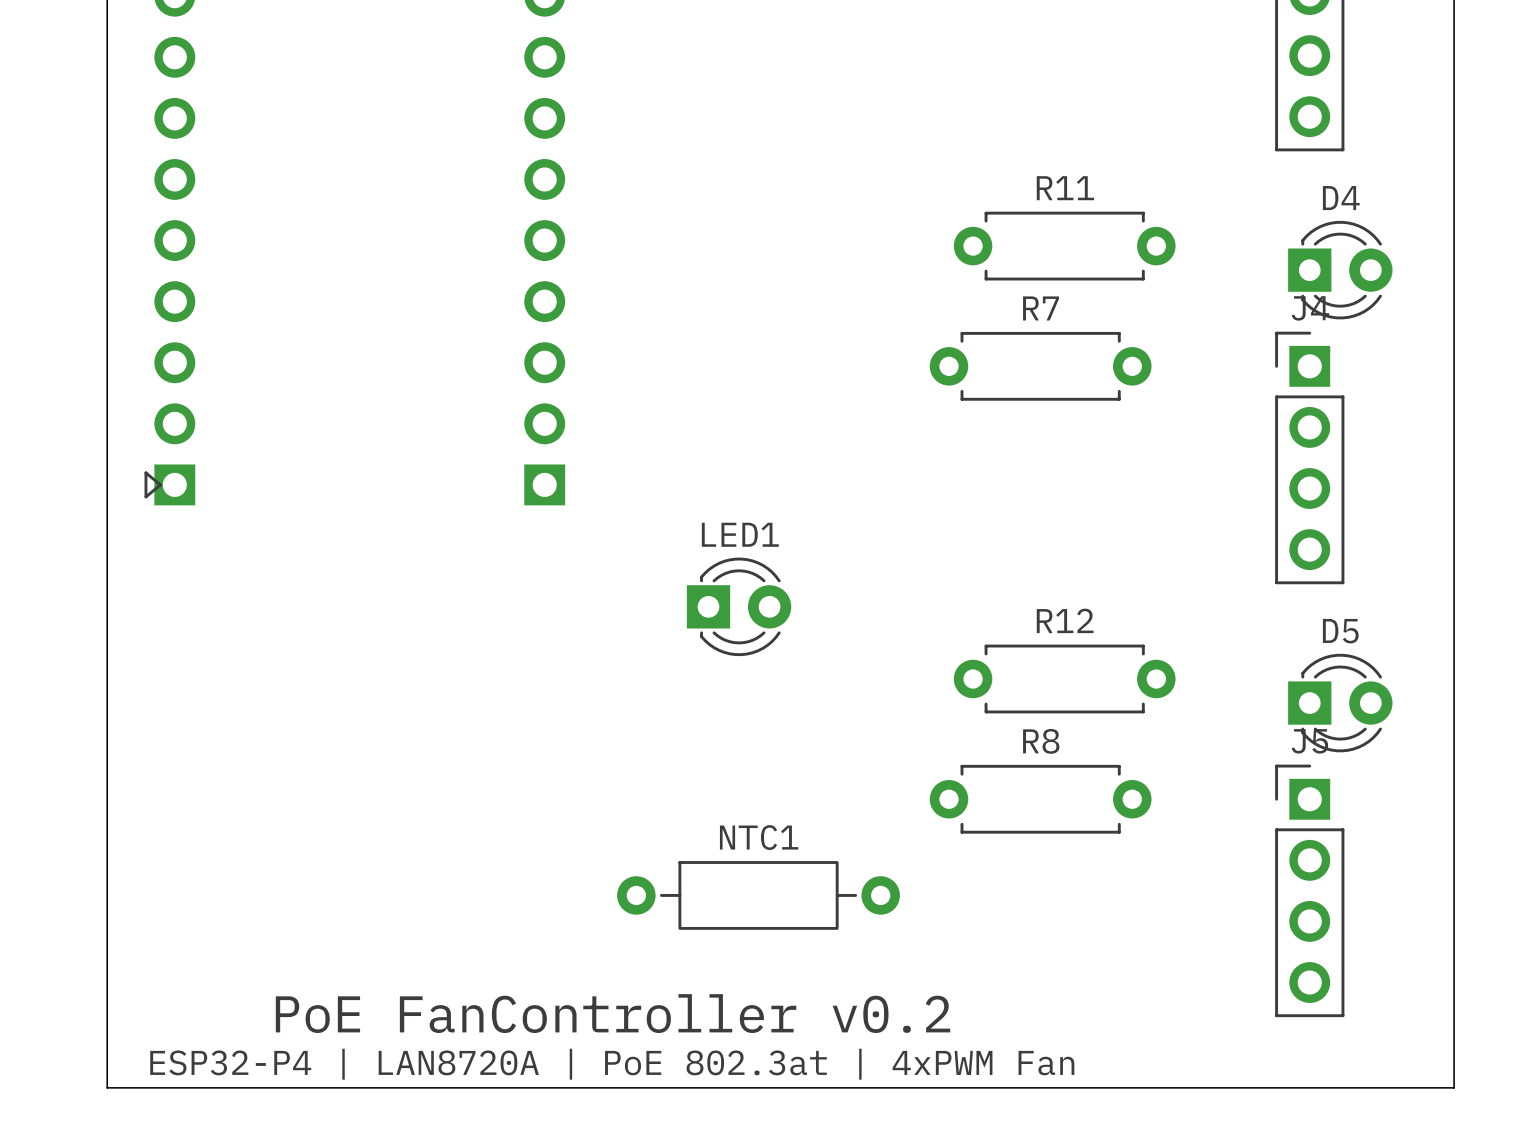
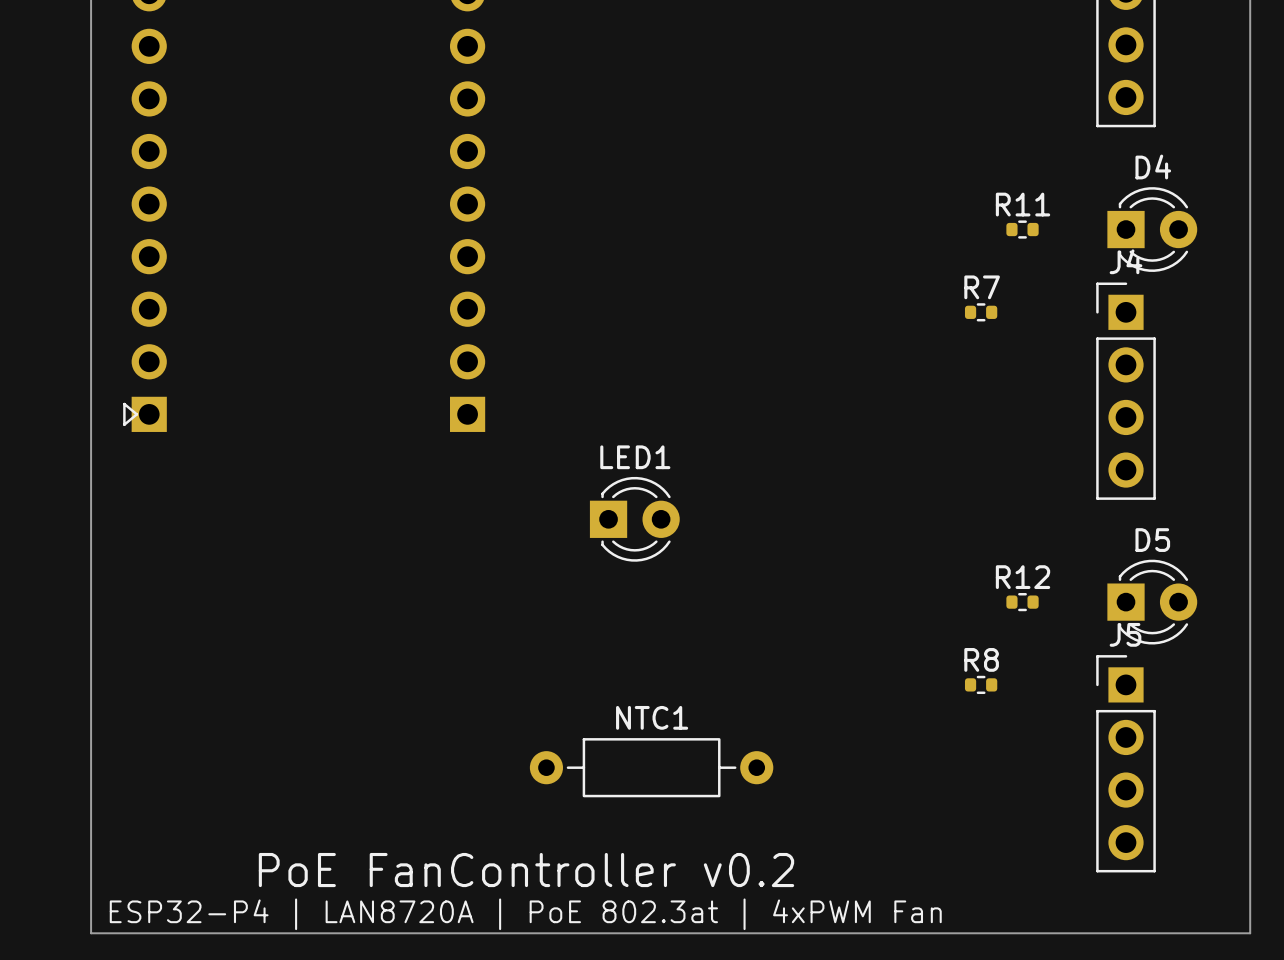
R11 footprint: [953, 211, 1176, 281] -> [1006, 220, 1039, 239]
R7 footprint: [929, 331, 1152, 401] -> [964, 303, 998, 322]
R12 footprint: [953, 644, 1176, 714] -> [1006, 593, 1039, 612]
R8 footprint: [929, 764, 1152, 834] -> [964, 675, 998, 695]

